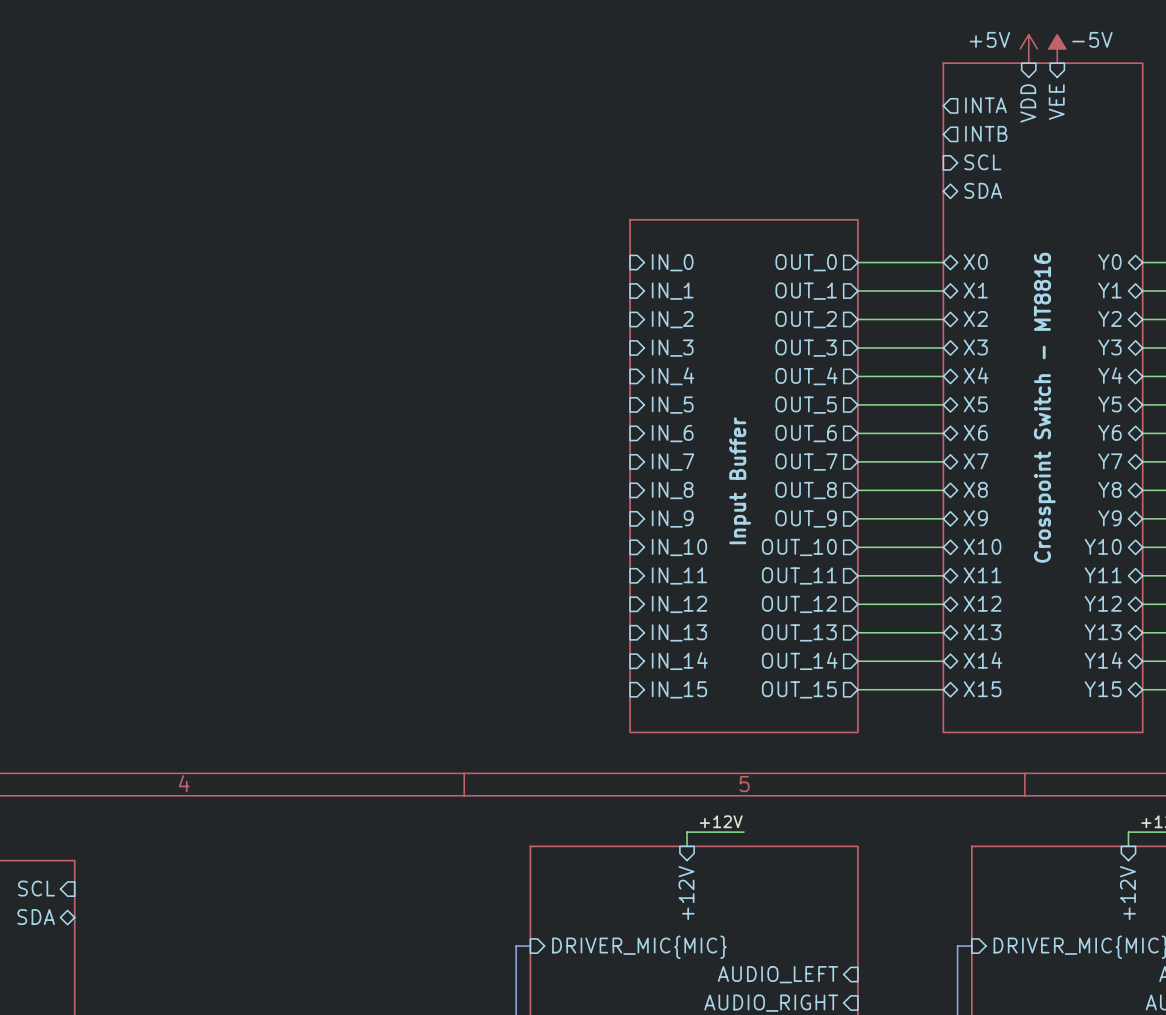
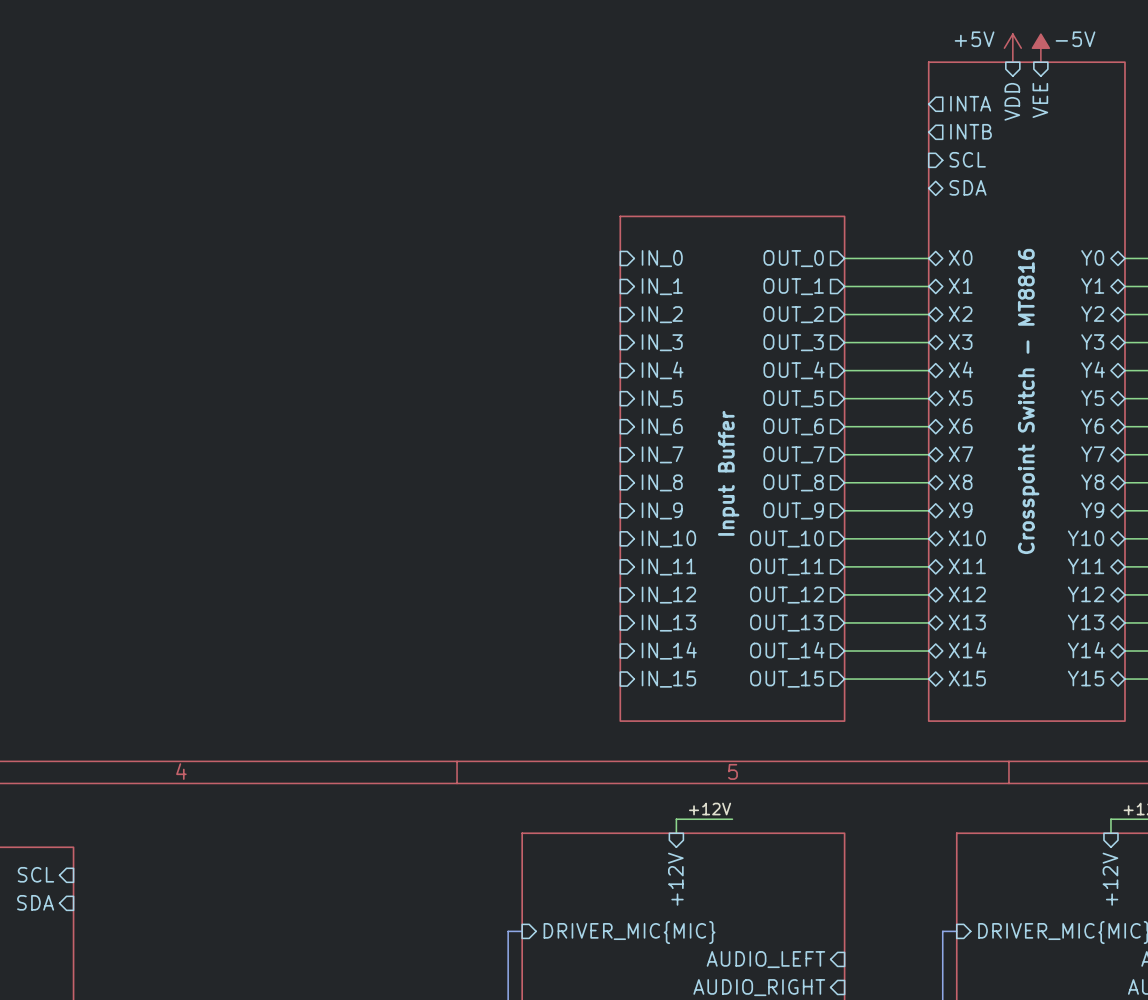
sheet pin shape: bidirectional (36, 917) -> input (35, 902)

